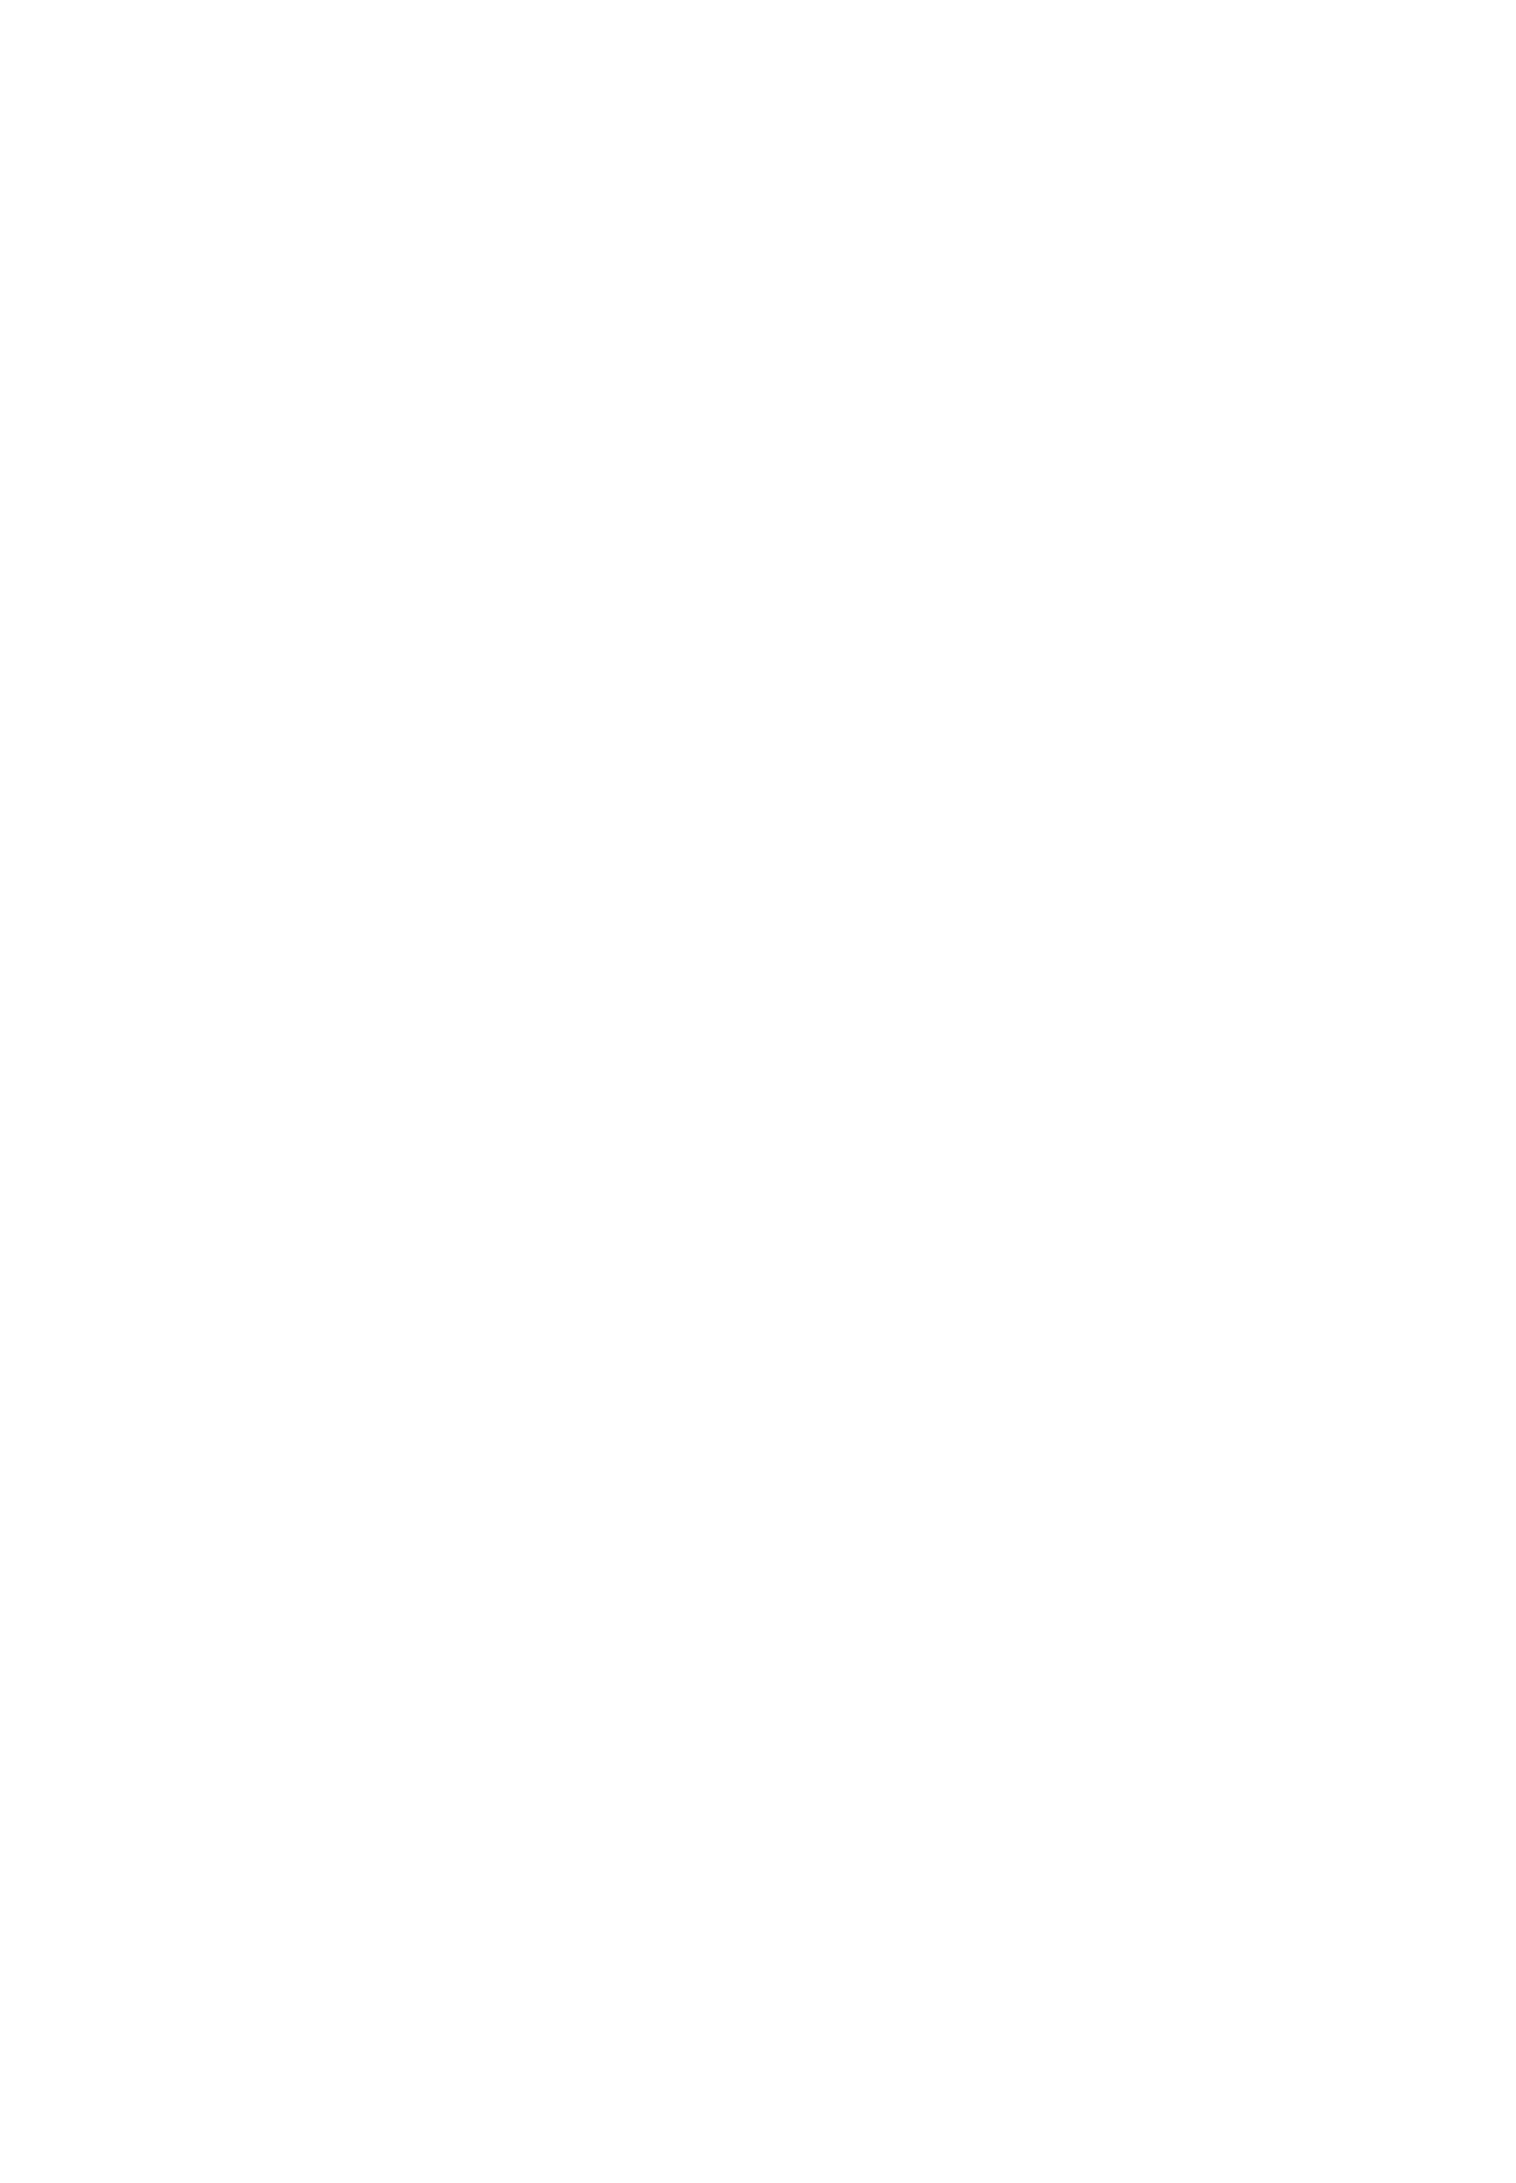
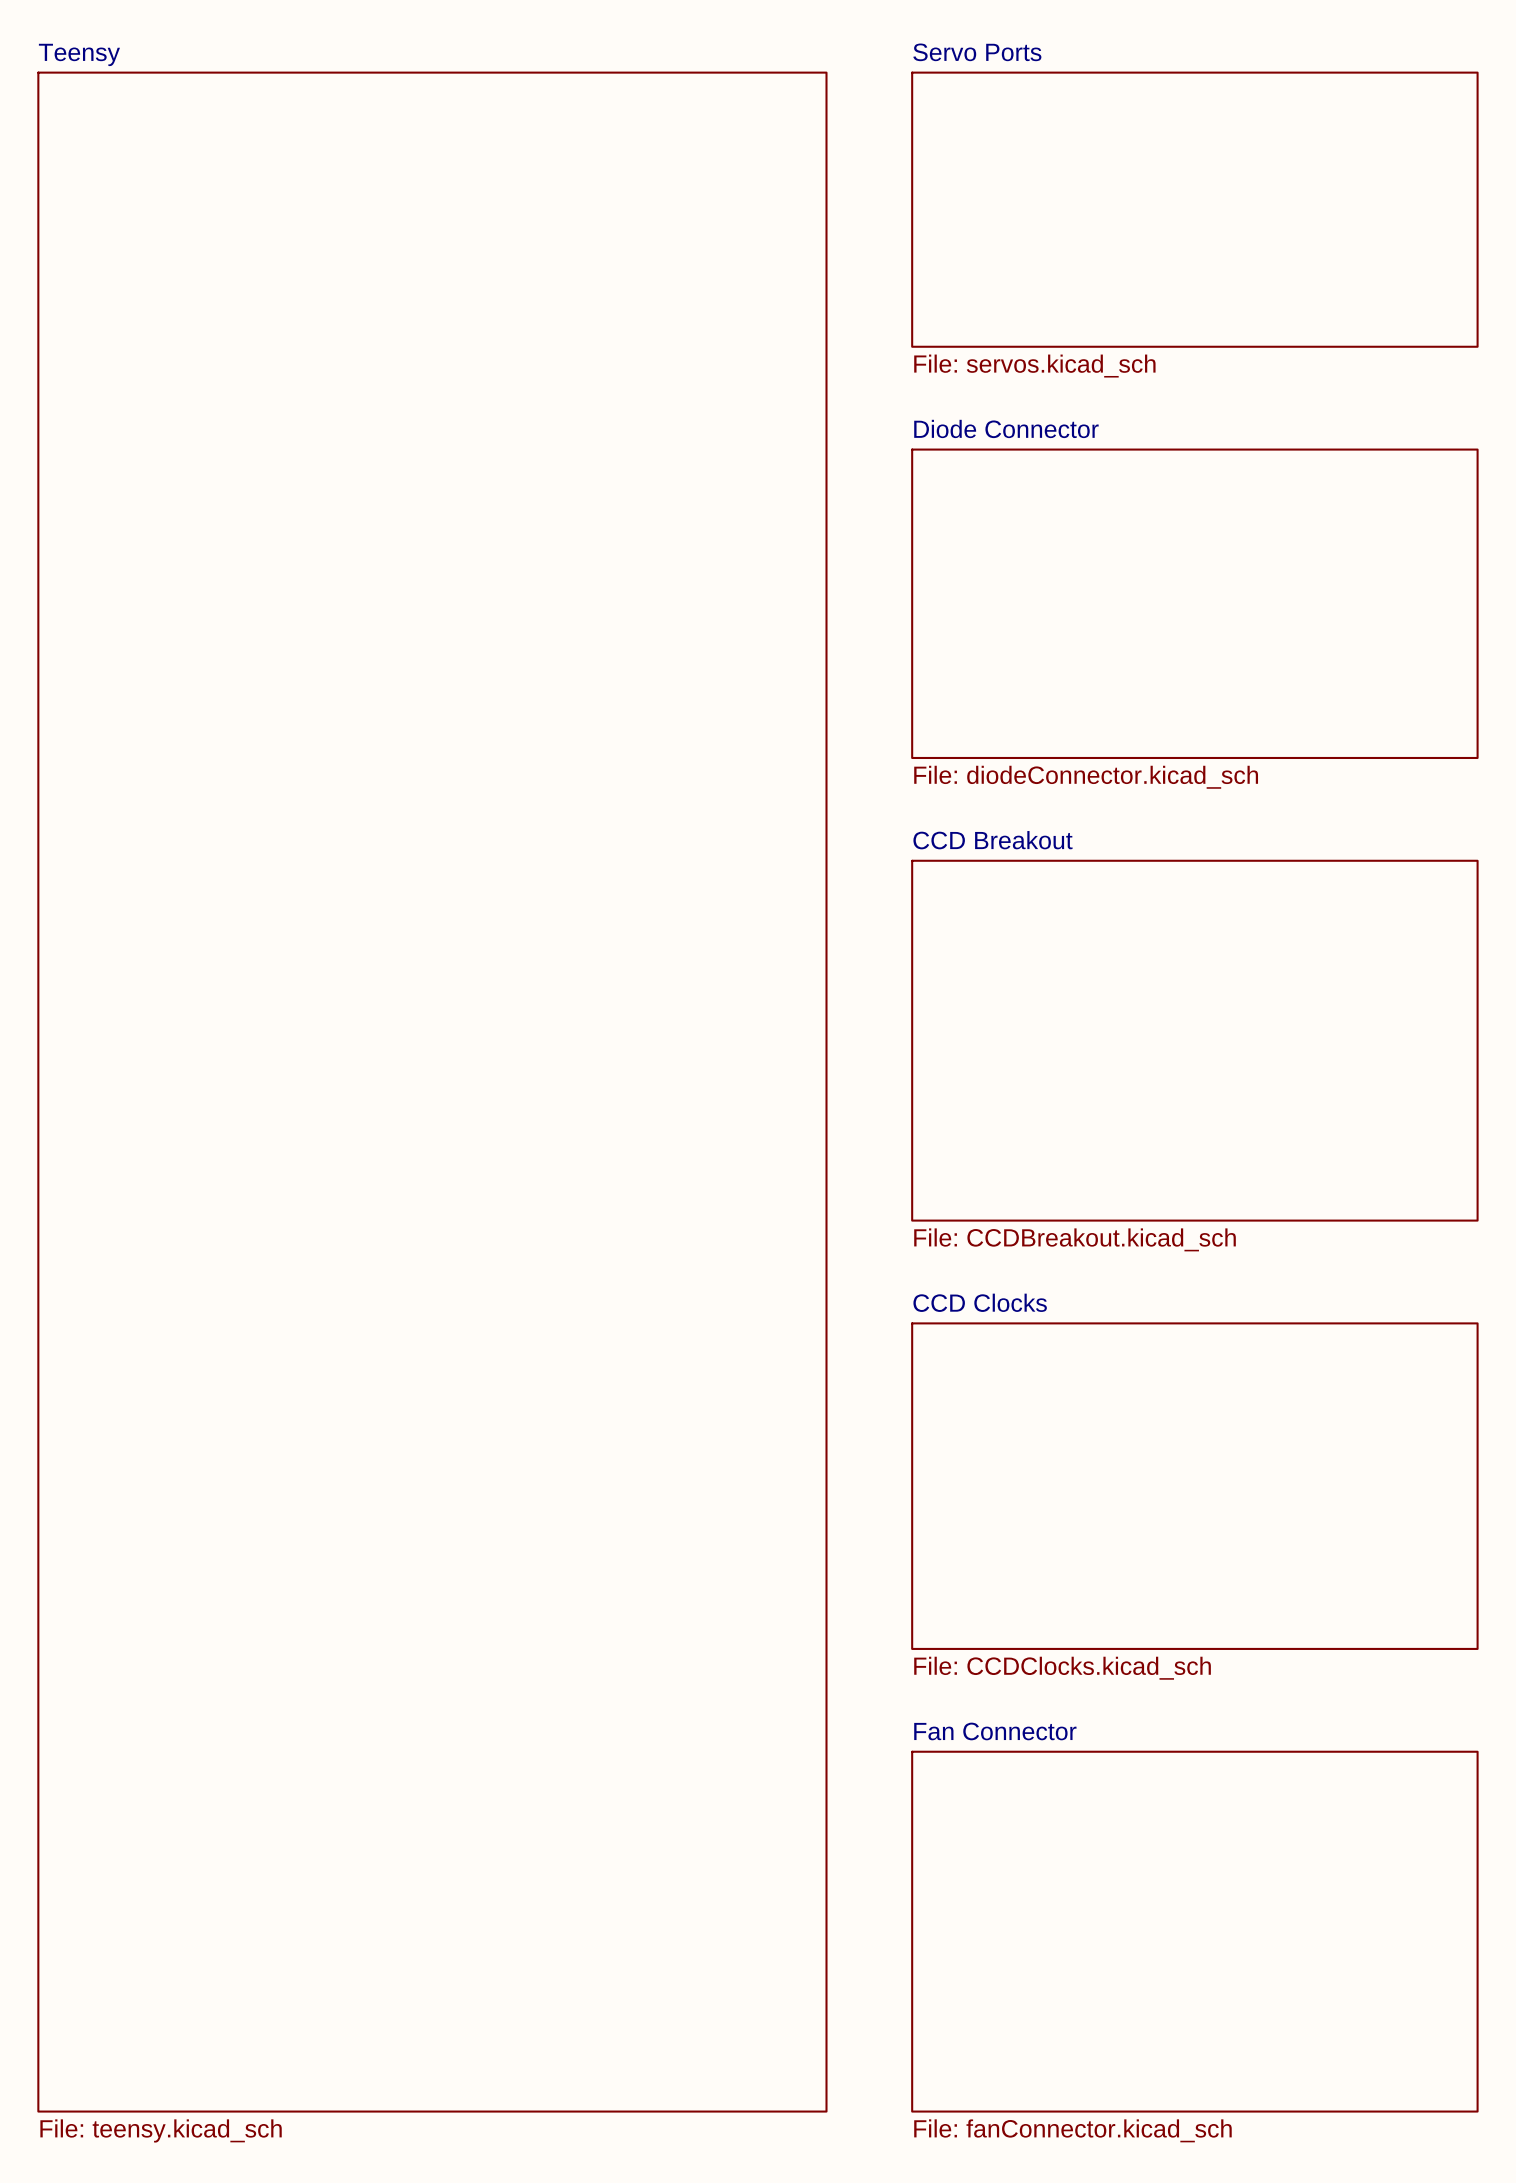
sheet Servo Ports: none -> File: servos.kicad_sch (1194, 209)
sheet Diode Connector: none -> File: diodeConnector.kicad_sch (1194, 603)
sheet CCD Breakout: none -> File: CCDBreakout.kicad_sch (1194, 1040)
sheet Teensy: none -> File: teensy.kicad_sch (432, 1092)
sheet CCD Clocks: none -> File: CCDClocks.kicad_sch (1194, 1486)
sheet Fan Connector: none -> File: fanConnector.kicad_sch (1194, 1931)

